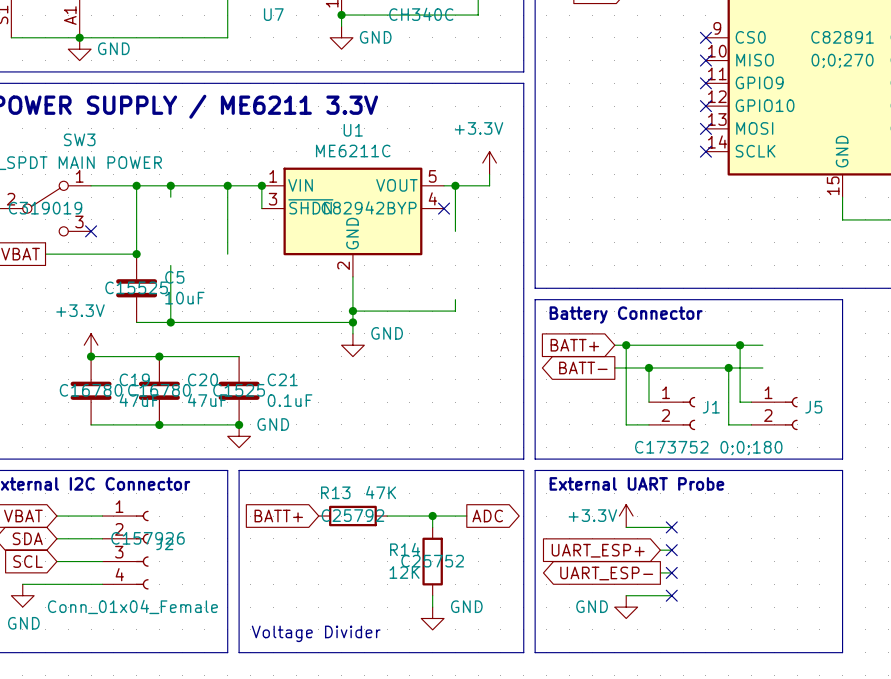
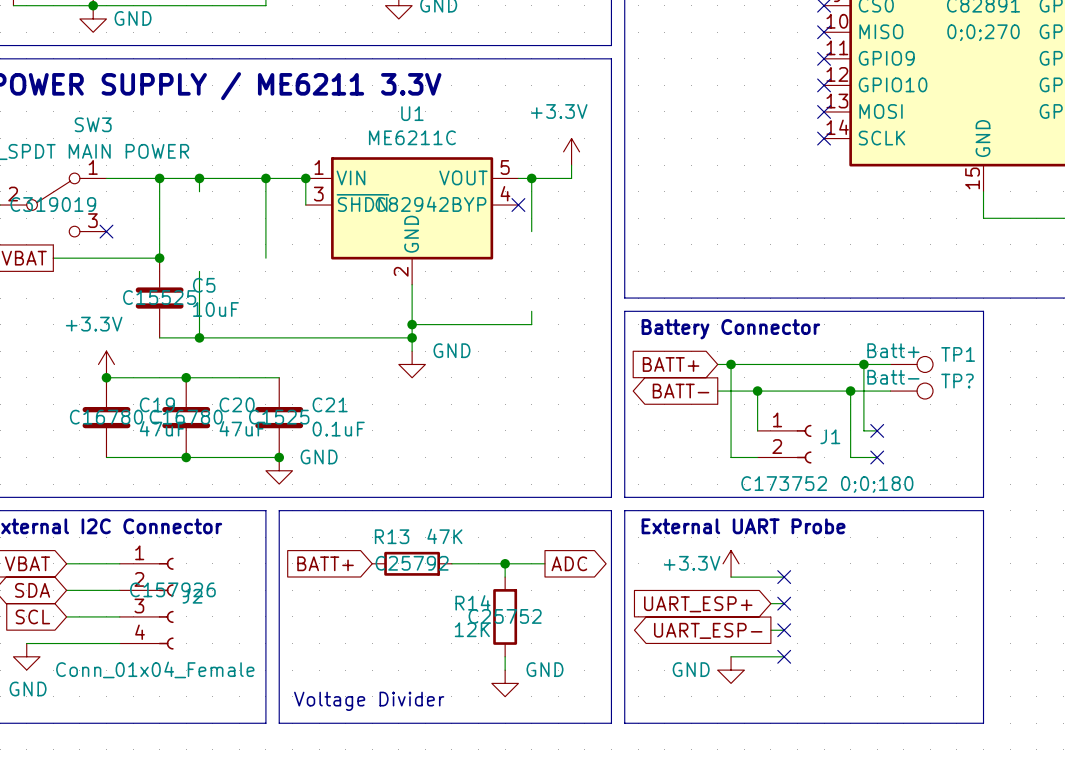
TP1: none -> Batt+ (911, 364)
TP?: none -> Batt- (911, 391)
no-connect mark: none -> (877, 430)
J5: (774, 413) -> none
no-connect mark: none -> (877, 457)

